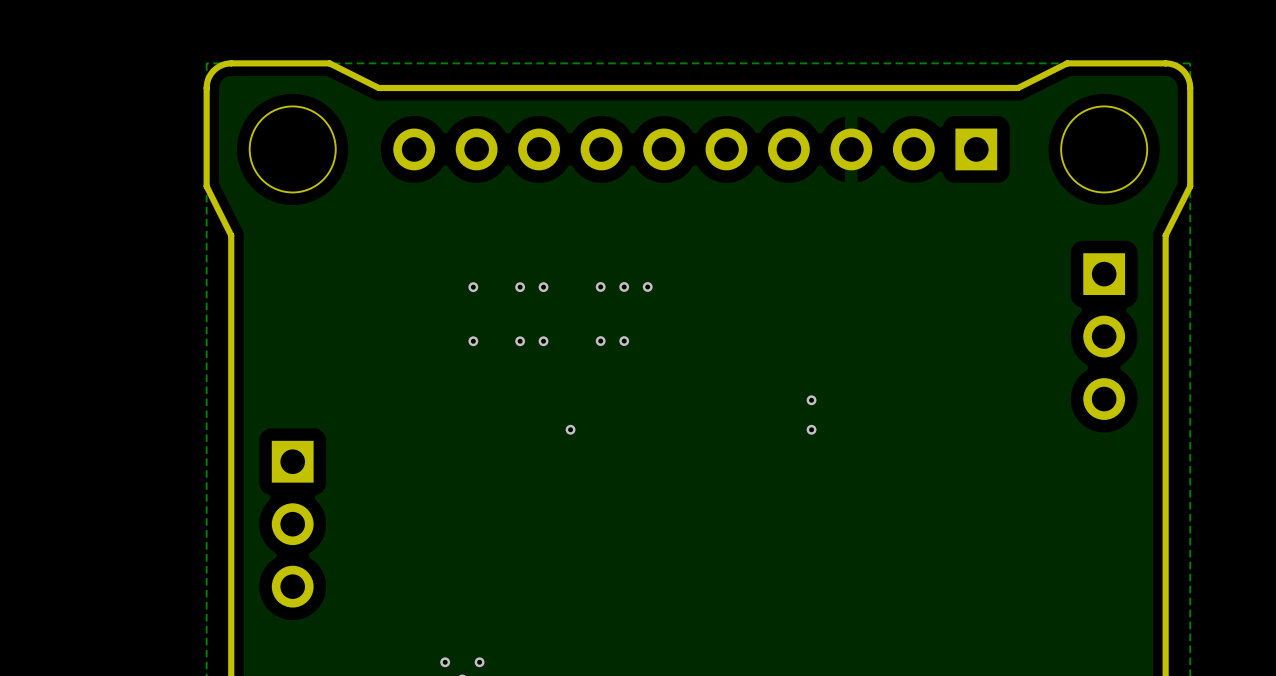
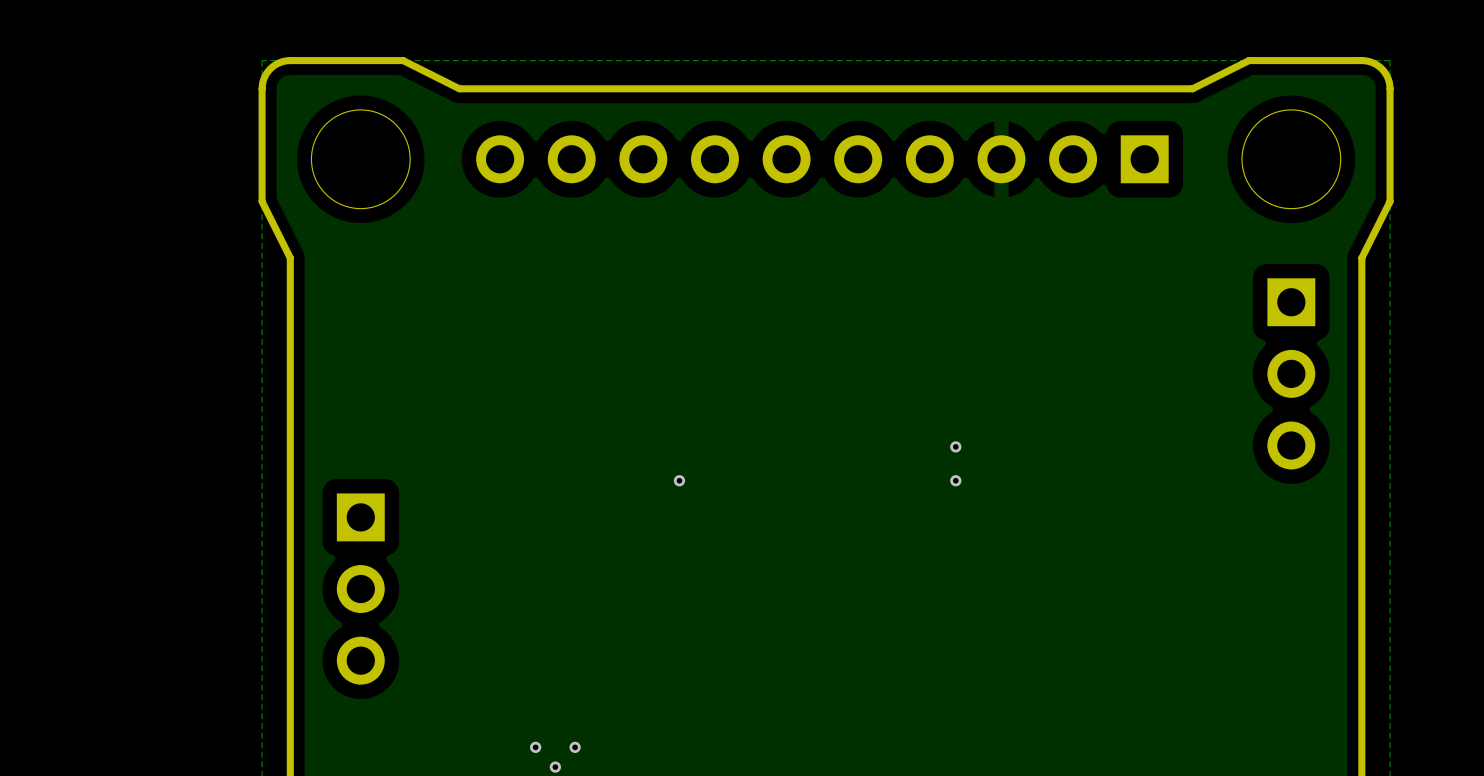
via: (600, 286) -> none
via: (624, 286) -> none
via: (647, 286) -> none
via: (473, 287) -> none
via: (520, 287) -> none
via: (543, 287) -> none
via: (473, 341) -> none
via: (520, 341) -> none
via: (543, 341) -> none
via: (600, 341) -> none
via: (624, 341) -> none

